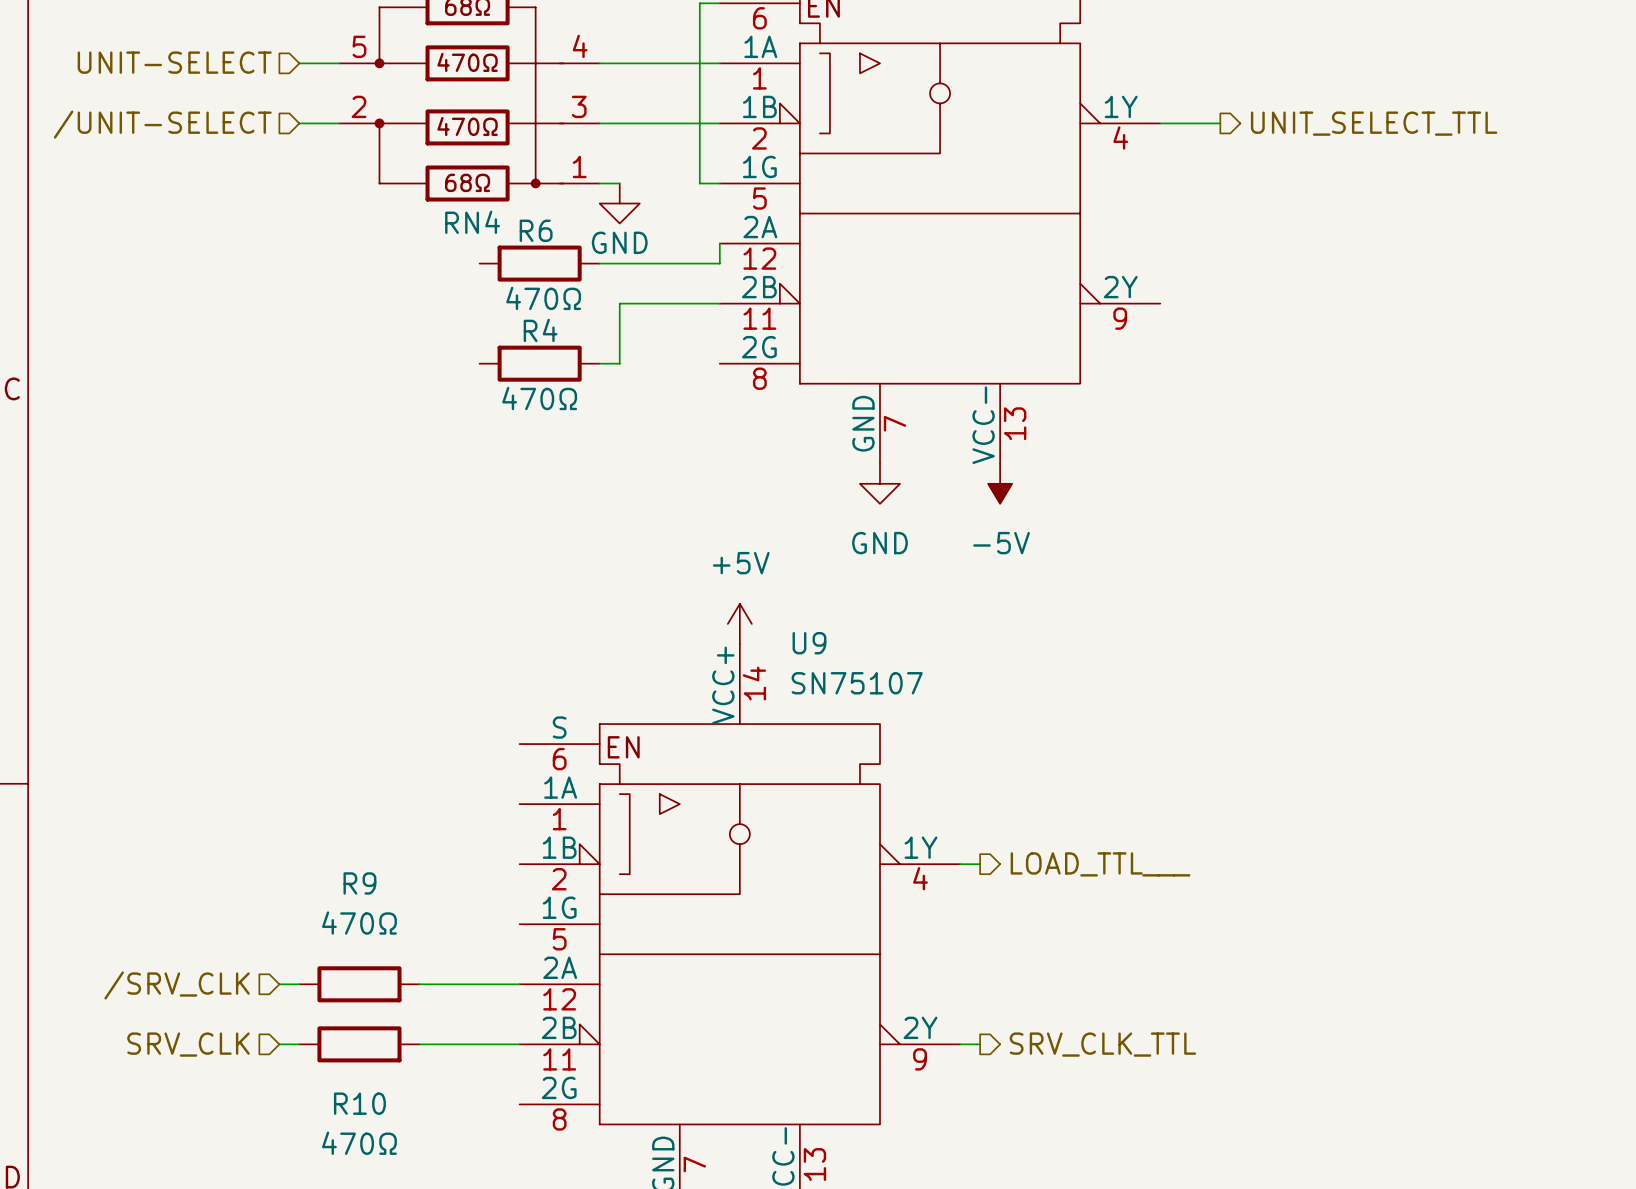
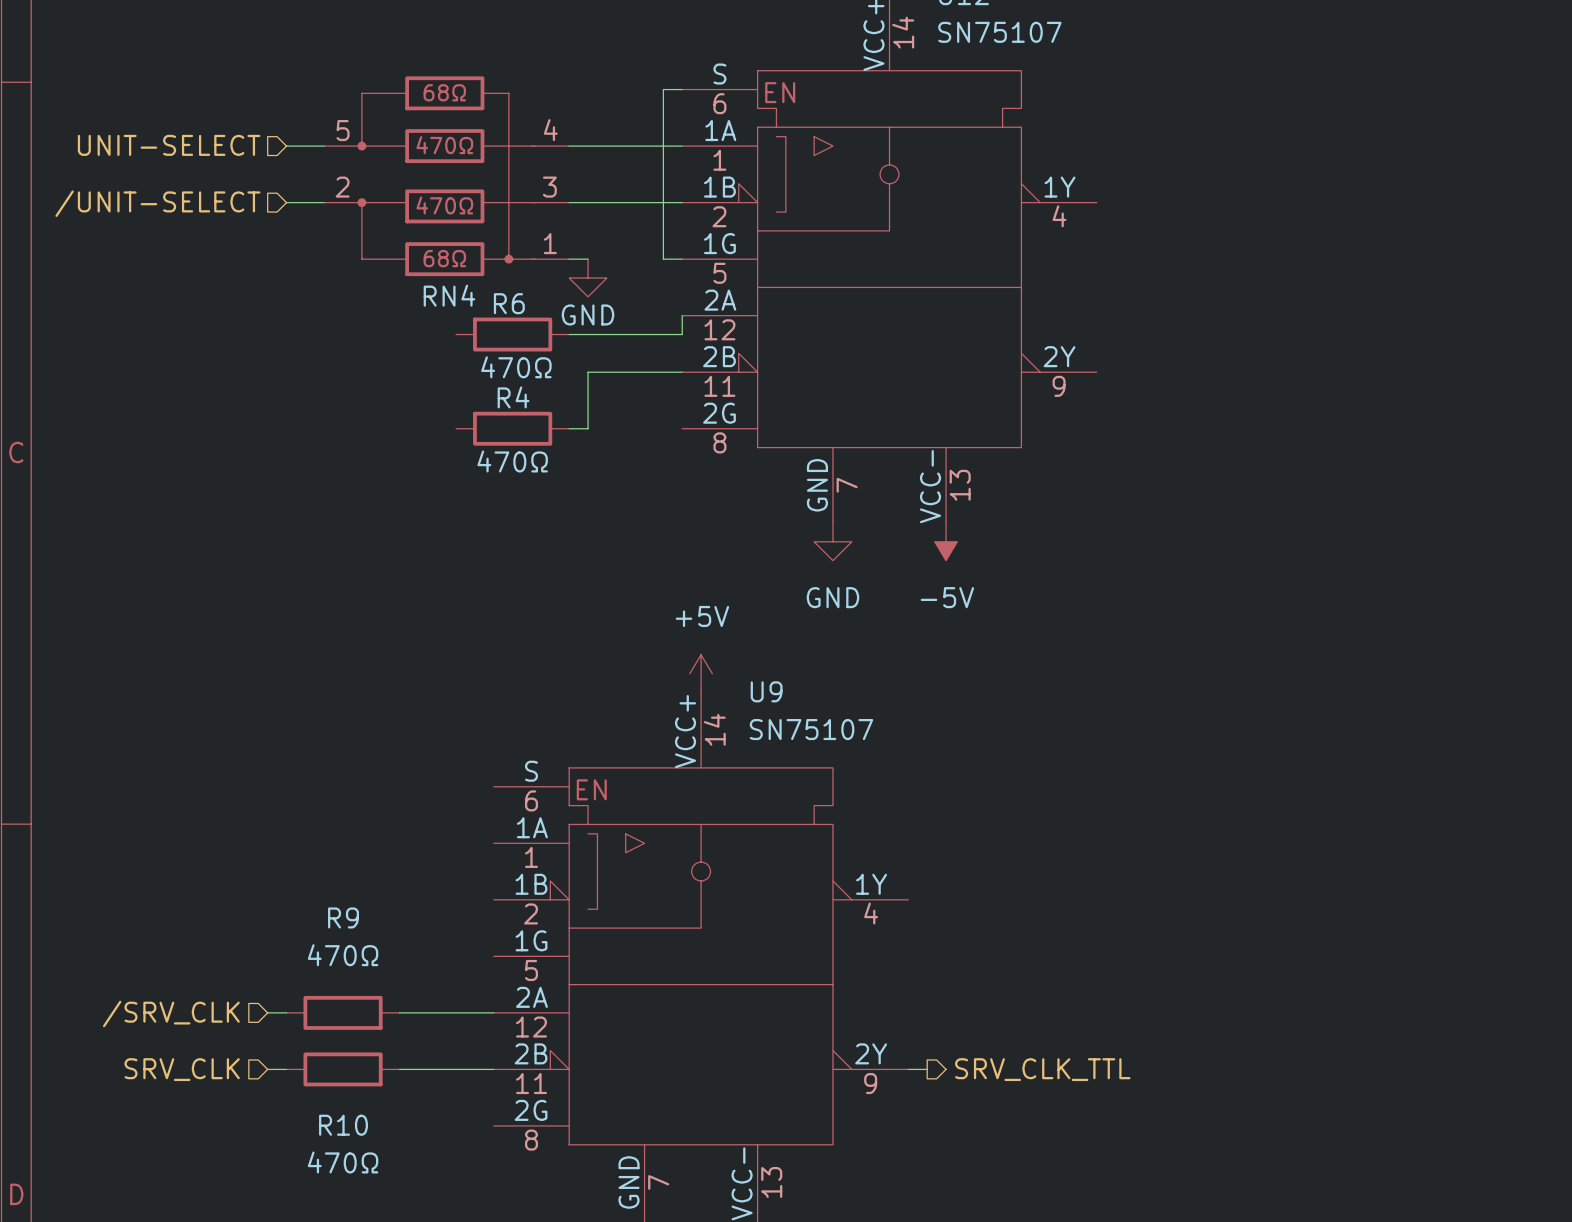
wire: (1160, 123) (1220, 123) -> none
hierarchical label: UNIT_SELECT_TTL (1374, 123) -> none
wire: (960, 864) (980, 864) -> none
hierarchical label: LOAD_TTL___ (1100, 864) -> none

